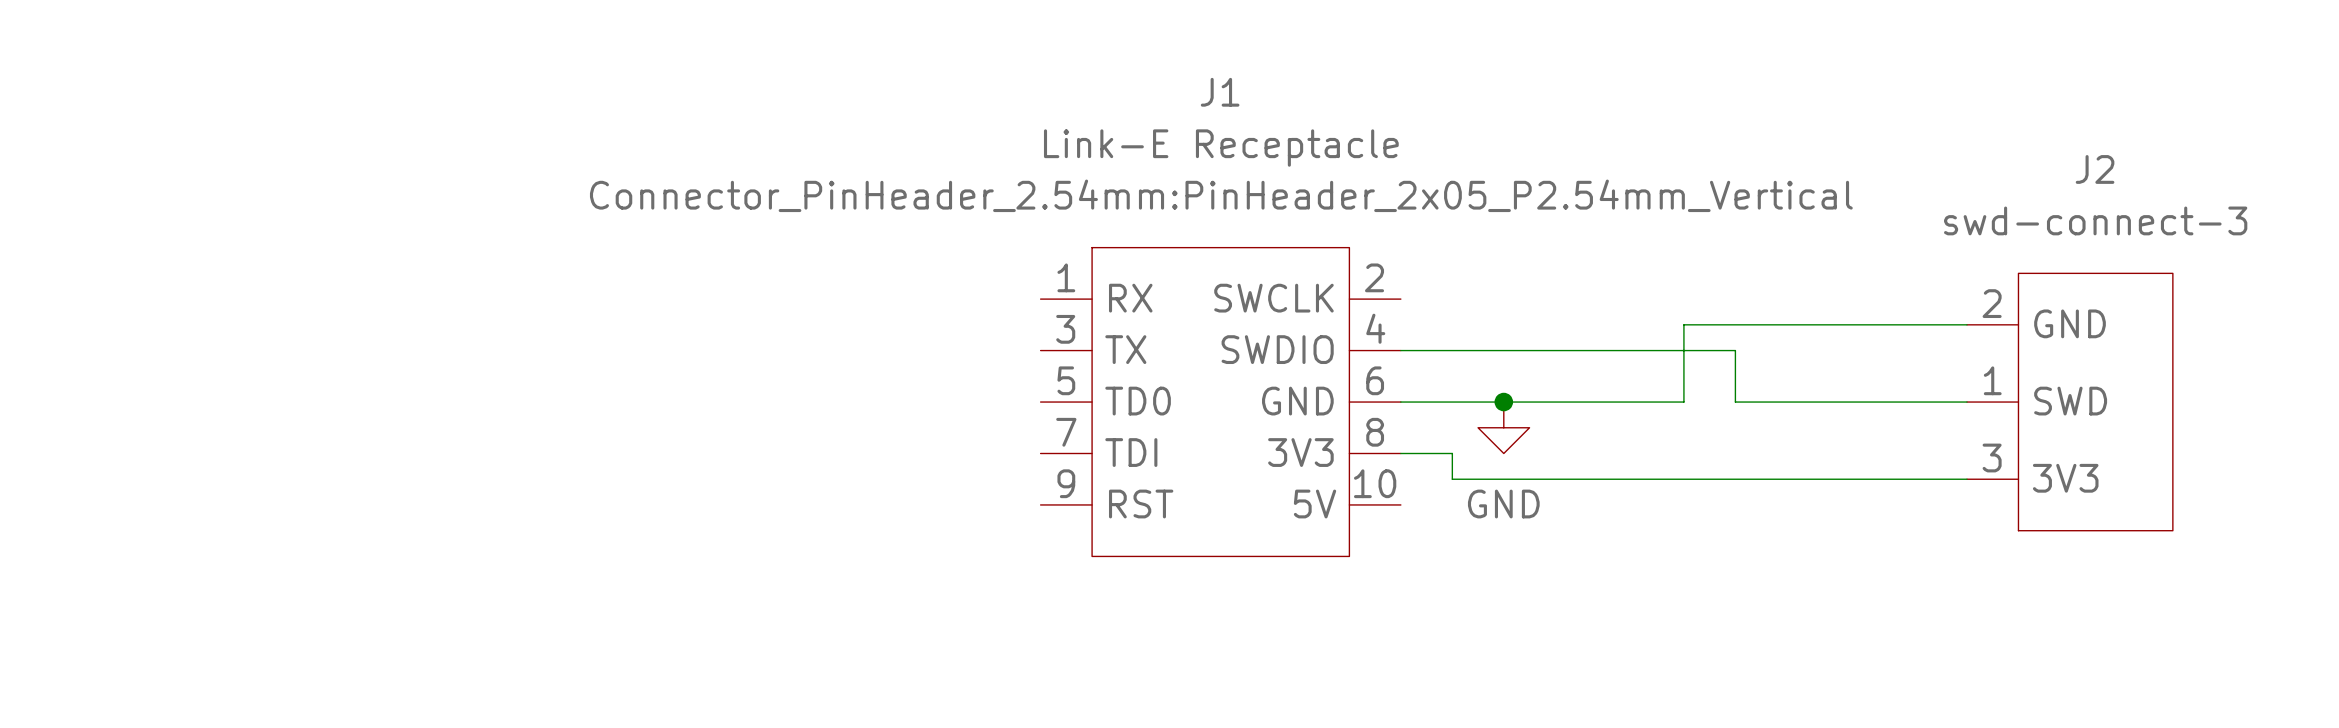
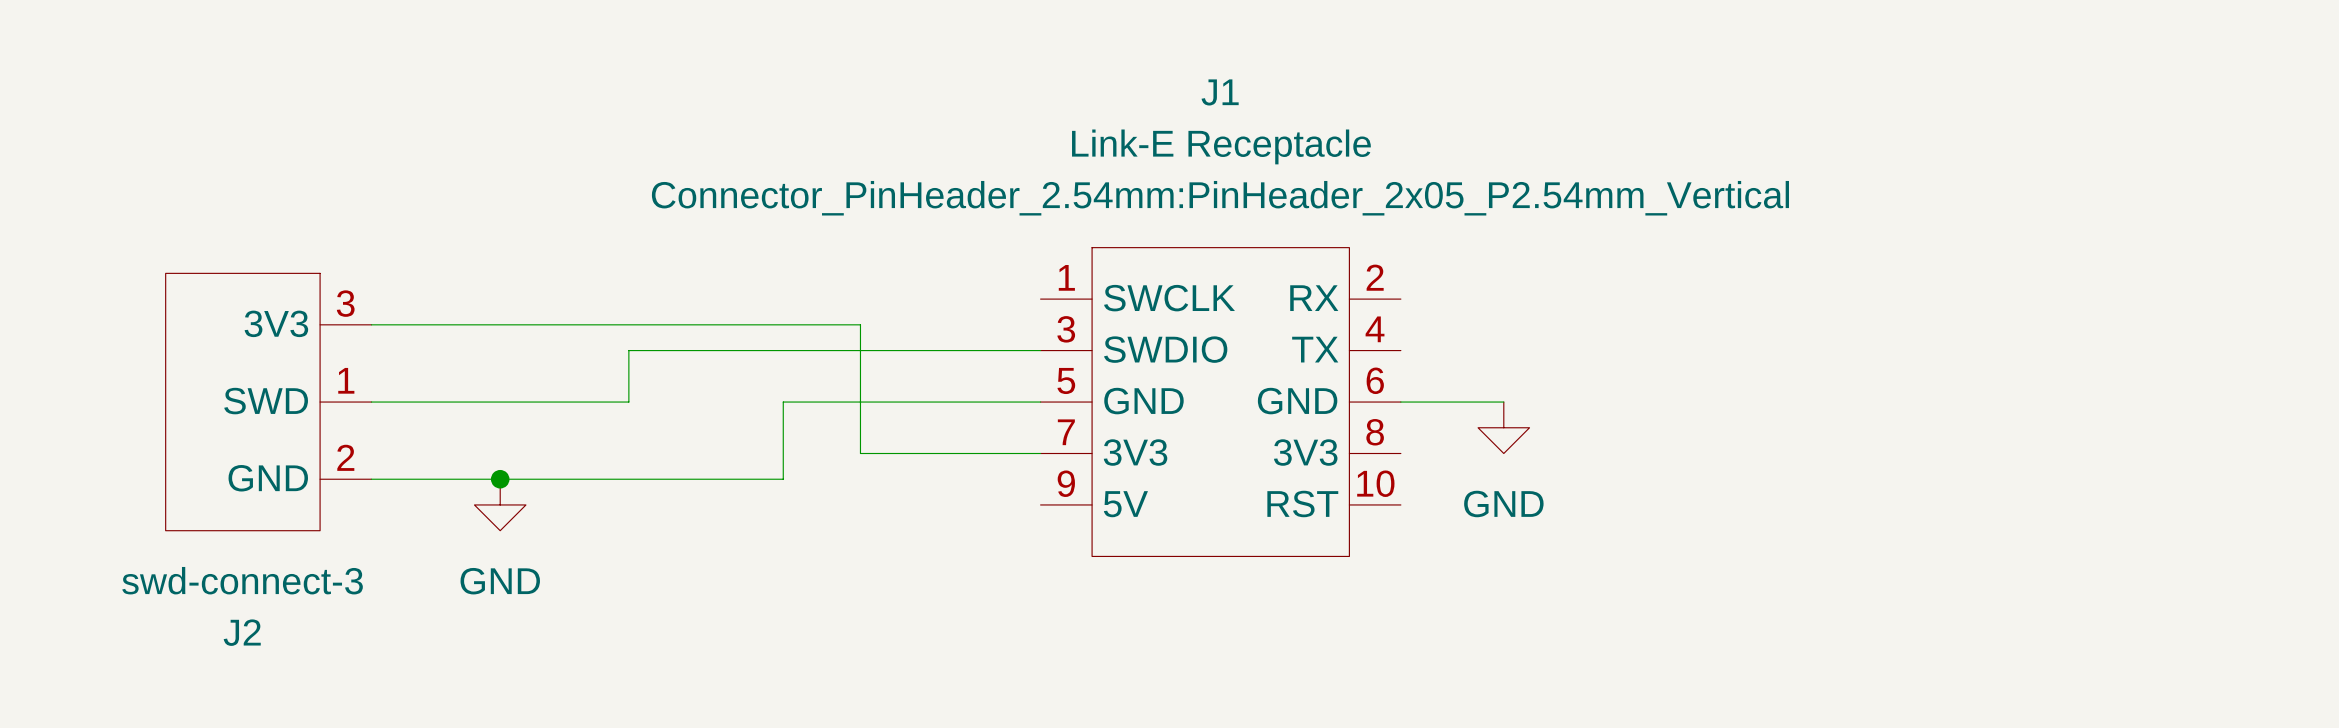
J1 pin name: RX (1130, 298) -> SWCLK (1169, 298)
J1 pin name: SWCLK (1273, 298) -> RX (1314, 298)
wire: none -> (371, 324) (860, 324) (860, 453) (1040, 453)
wire: (1967, 324) (1683, 324) (1683, 402) (1503, 402) -> none
J1 pin name: TX (1125, 349) -> SWDIO (1165, 349)
J1 pin name: SWDIO (1277, 349) -> TX (1315, 349)
wire: none -> (1040, 350) (628, 350) (628, 402) (371, 402)
wire: (1400, 350) (1735, 350) (1735, 402) (1967, 402) -> none
J1 pin name: TD0 (1138, 401) -> GND (1143, 401)
wire: none -> (1040, 402) (783, 402) (783, 479) (371, 479)
junction: (1503, 402) -> none
J2 position: (2069, 402) -> (268, 402)
J2 rotation: 0° (2095, 402) -> 180° (242, 402)
J1 pin name: TDI (1131, 452) -> 3V3 (1135, 452)
wire: (1400, 453) (1452, 453) (1452, 479) (1967, 479) -> none
junction: none -> (500, 479)
power symbol: none -> GND (500, 504)
J1 pin name: RST (1141, 504) -> 5V (1125, 504)
J1 pin name: 5V (1315, 504) -> RST (1302, 503)

